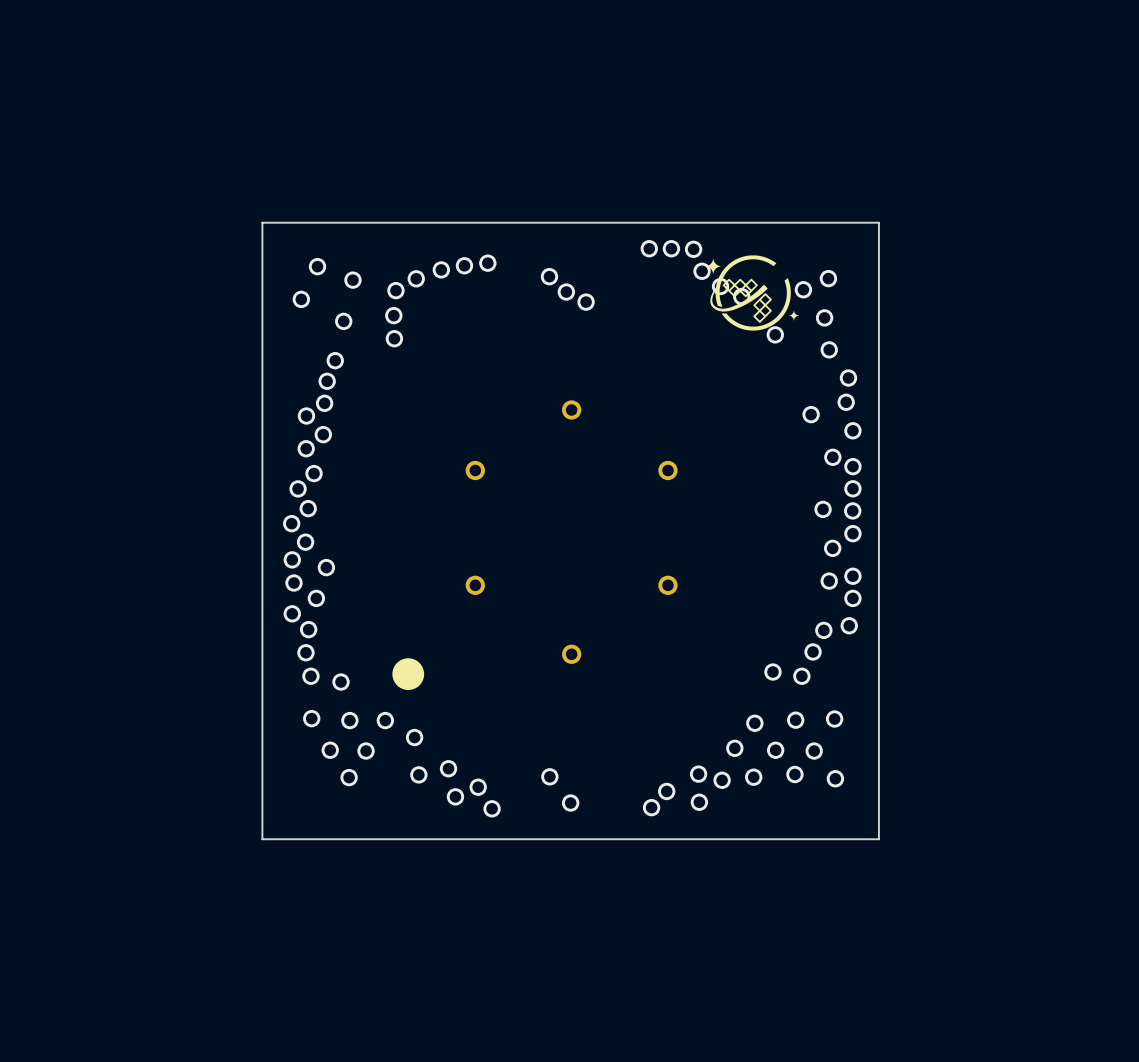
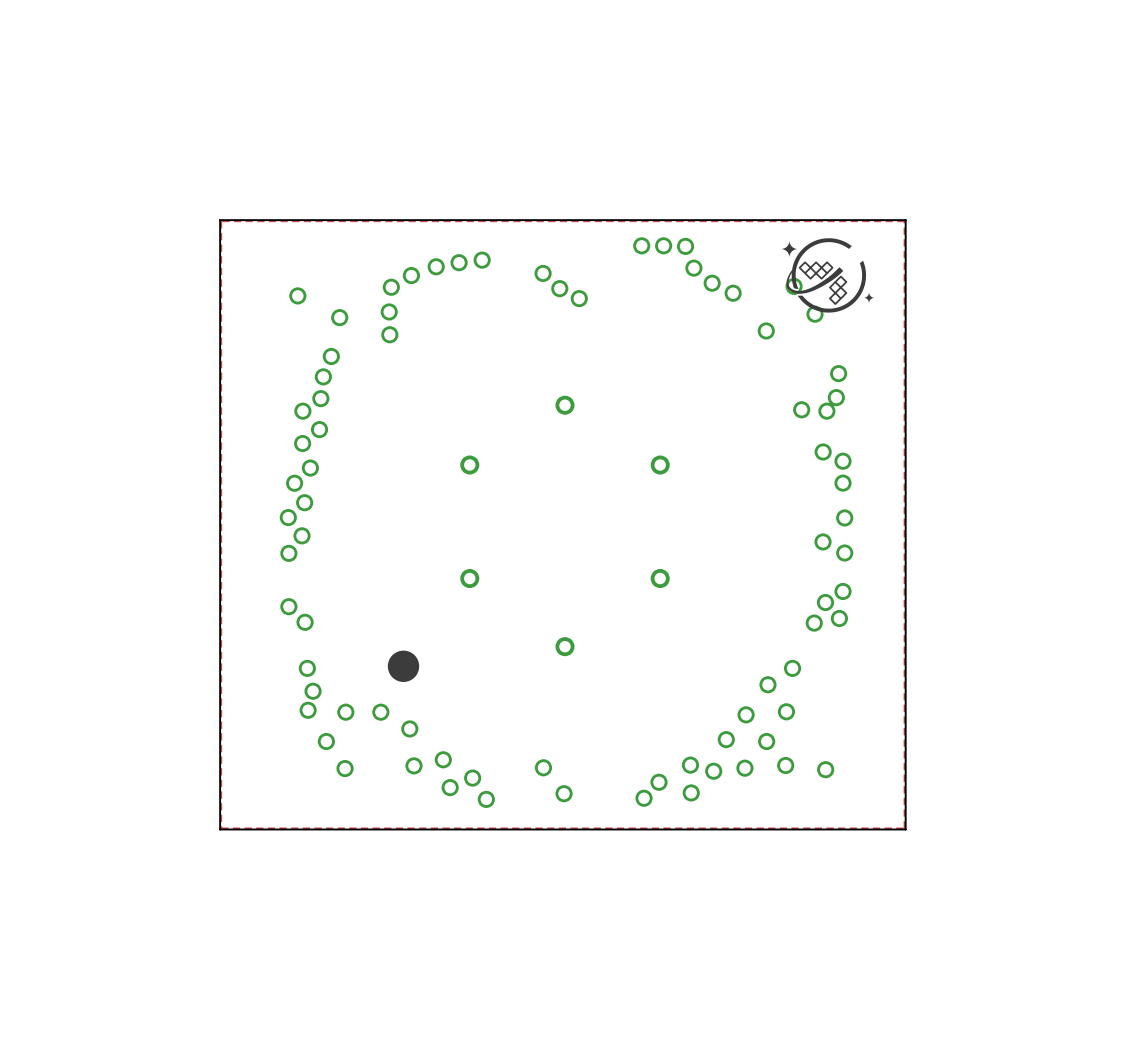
board edge: (262, 222) (262, 839) -> (259, 220) (220, 220) (220, 829) (259, 829)
board edge: (878, 222) (878, 839) -> (868, 220) (905, 220) (905, 829) (868, 829)
zone outline: none -> (221, 221) (221, 828) (904, 828) (904, 221) (221, 221)
via: (317, 266) -> none
via: (828, 278) -> none
via: (352, 280) -> none
drawing position: (752, 292) -> (827, 275)
via: (829, 349) -> none
via position: (852, 430) -> (826, 411)
via: (823, 509) -> none
via: (852, 510) -> none
via: none -> (844, 517)
via: (852, 533) -> none
via: (326, 567) -> none
via position: (852, 576) -> (844, 552)
via: (829, 581) -> none
via: (294, 583) -> none
via: (316, 598) -> none
via: none -> (825, 602)
via: (813, 651) -> none
via: (305, 652) -> none
via position: (772, 672) -> (767, 684)
via: (341, 682) -> none
via: none -> (313, 691)
via: (834, 719) -> none
via: (366, 751) -> none
via: (814, 751) -> none

